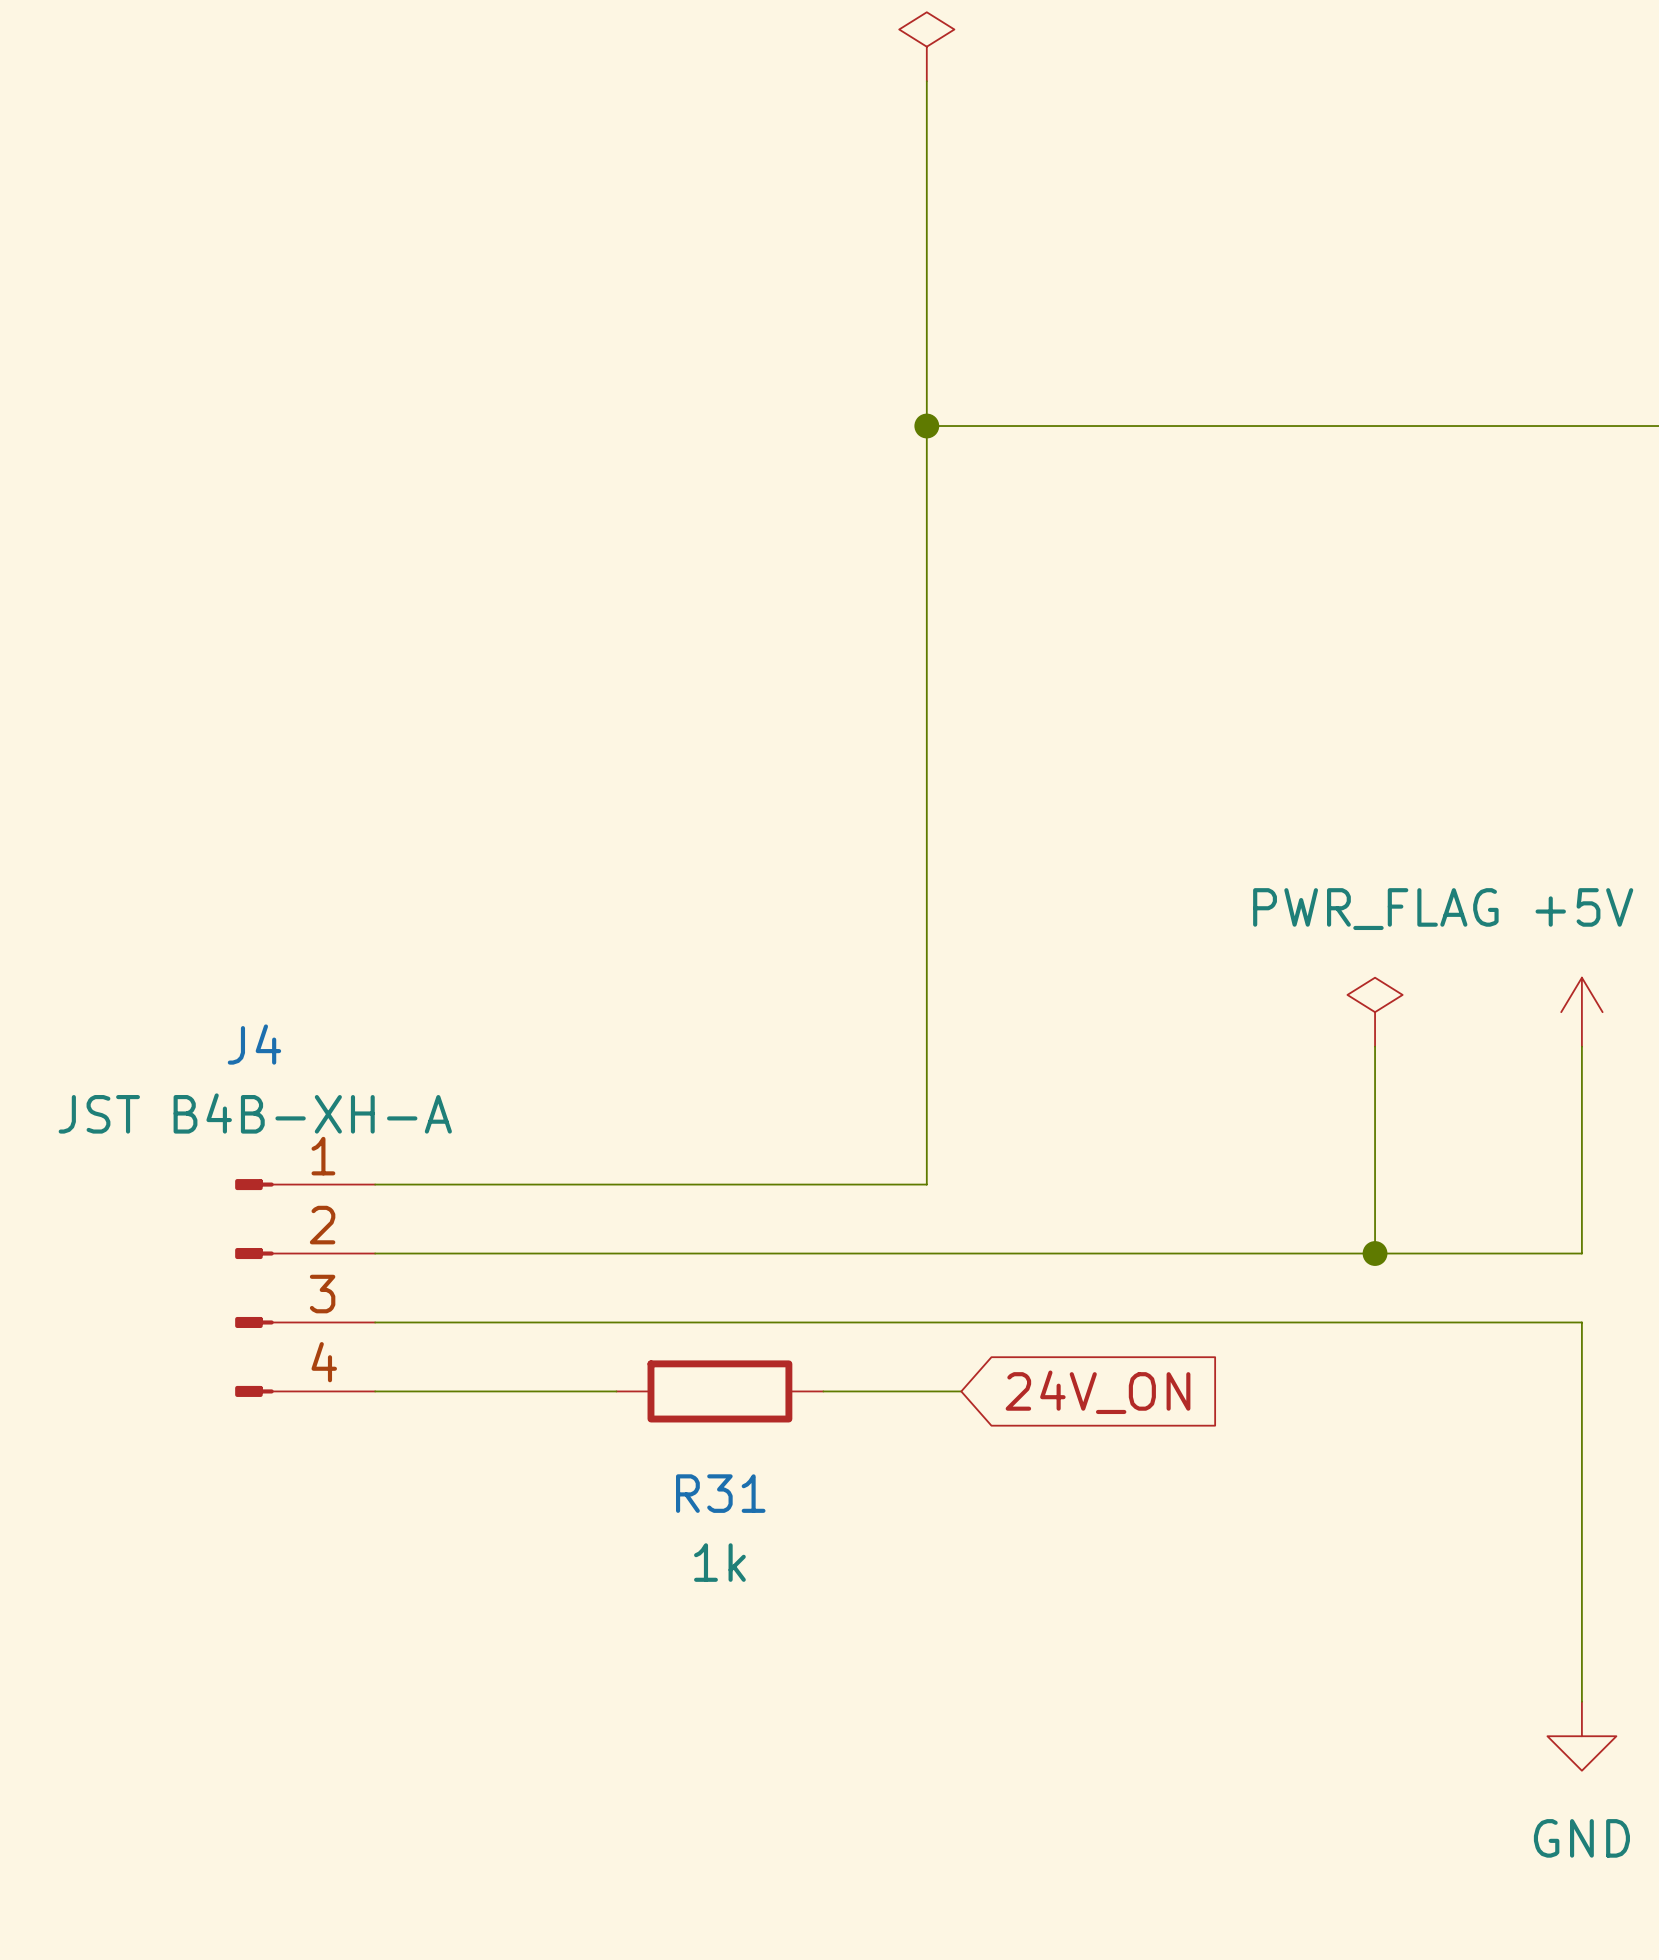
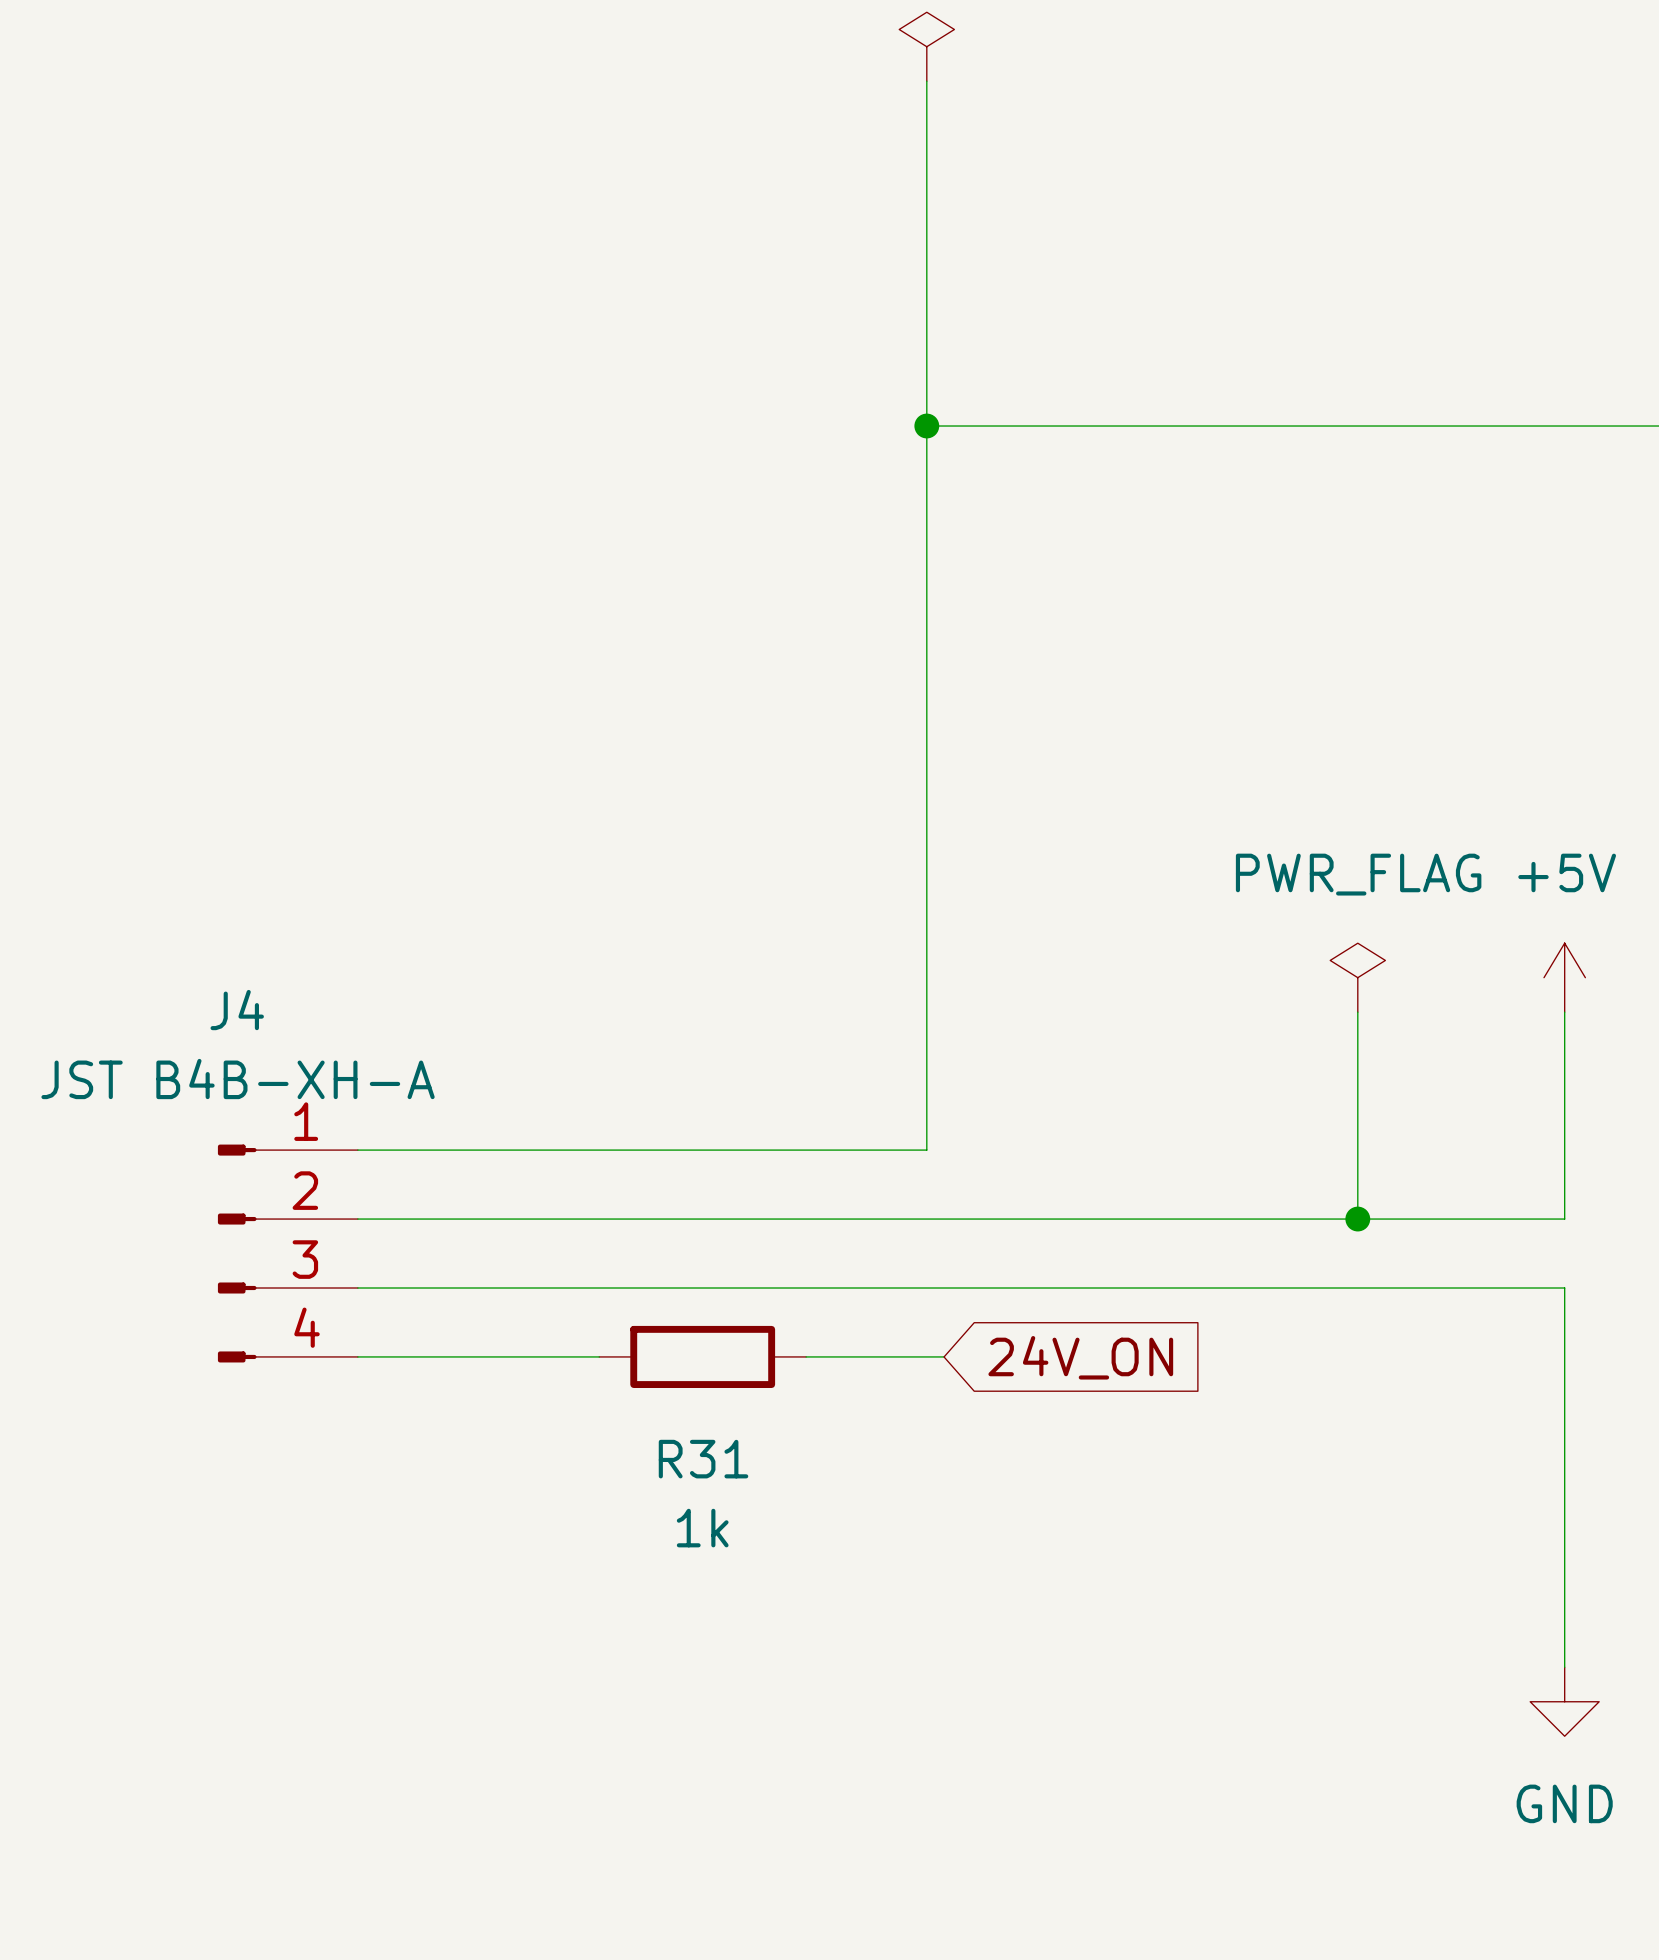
power symbol position: PWR_FLAG (1375, 1012) -> PWR_FLAG (1357, 977)
power symbol position: +5V (1581, 1012) -> +5V (1564, 977)
wire: (1375, 1046) (1375, 1253) -> (1357, 1012) (1357, 1219)
wire: (1581, 1046) (1581, 1253) (375, 1253) -> (1564, 1012) (1564, 1219) (357, 1219)
wire: (926, 1150) (926, 1184) (375, 1184) -> (926, 1150) (357, 1150)
junction position: (1375, 1253) -> (1357, 1219)
J4 position: (305, 1288) -> (287, 1253)
wire: (375, 1322) (1581, 1322) (1581, 1701) -> (357, 1288) (1564, 1288) (1564, 1667)
wire: (375, 1391) (616, 1391) -> (357, 1356) (599, 1356)
R31 position: (719, 1391) -> (702, 1356)
wire: (823, 1391) (961, 1391) -> (806, 1356) (944, 1356)
global label position: 24V_ON (1098, 1392) -> 24V_ON (1080, 1357)
power symbol position: GND (1581, 1736) -> GND (1564, 1701)

